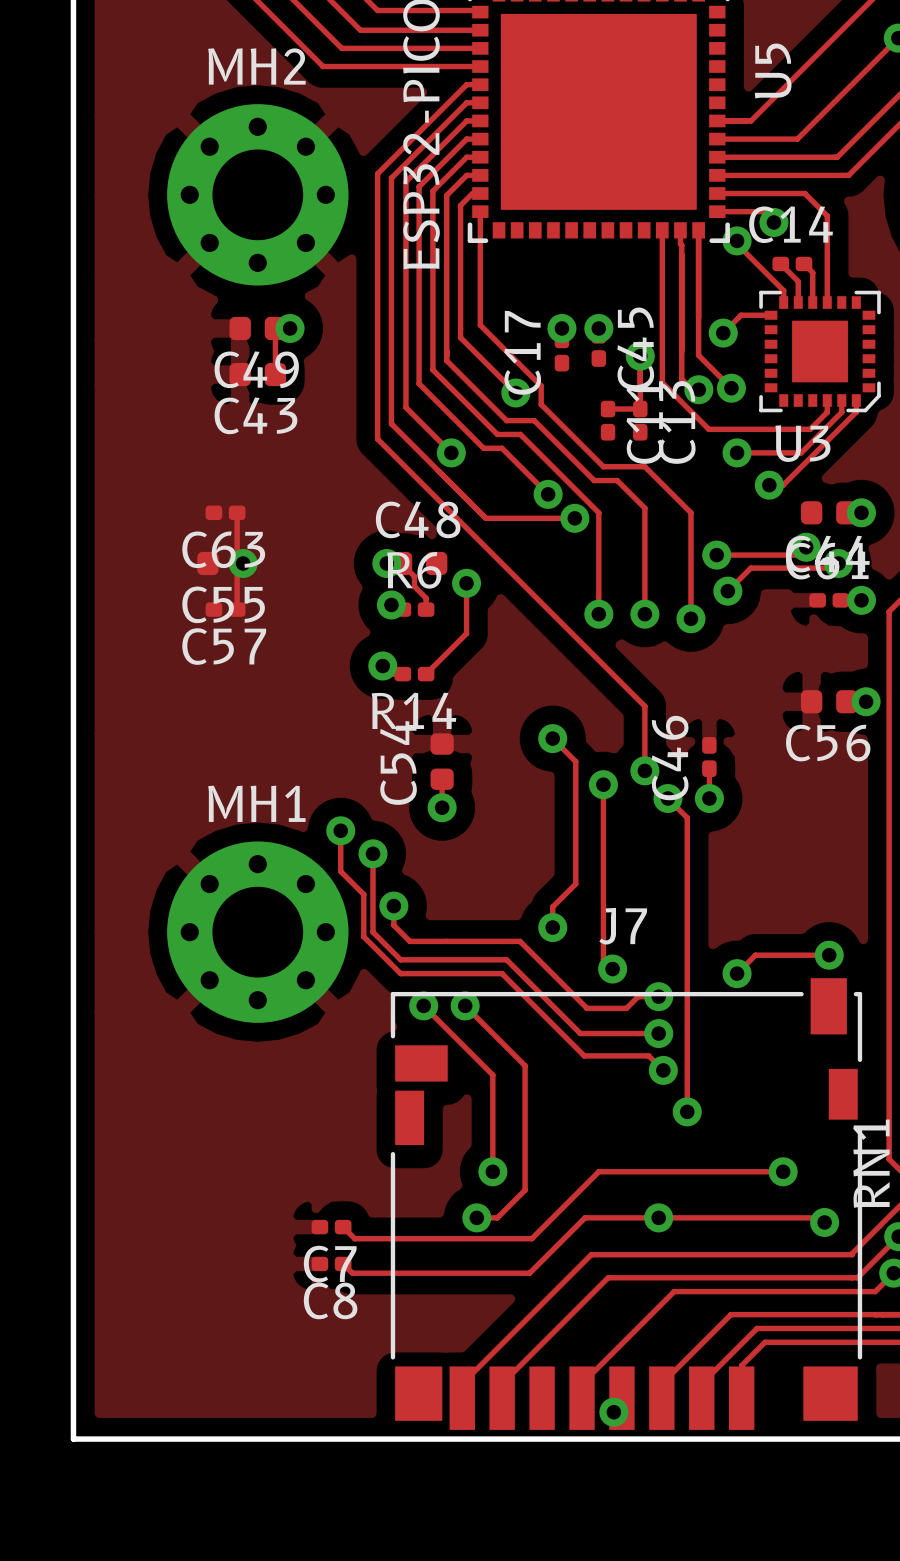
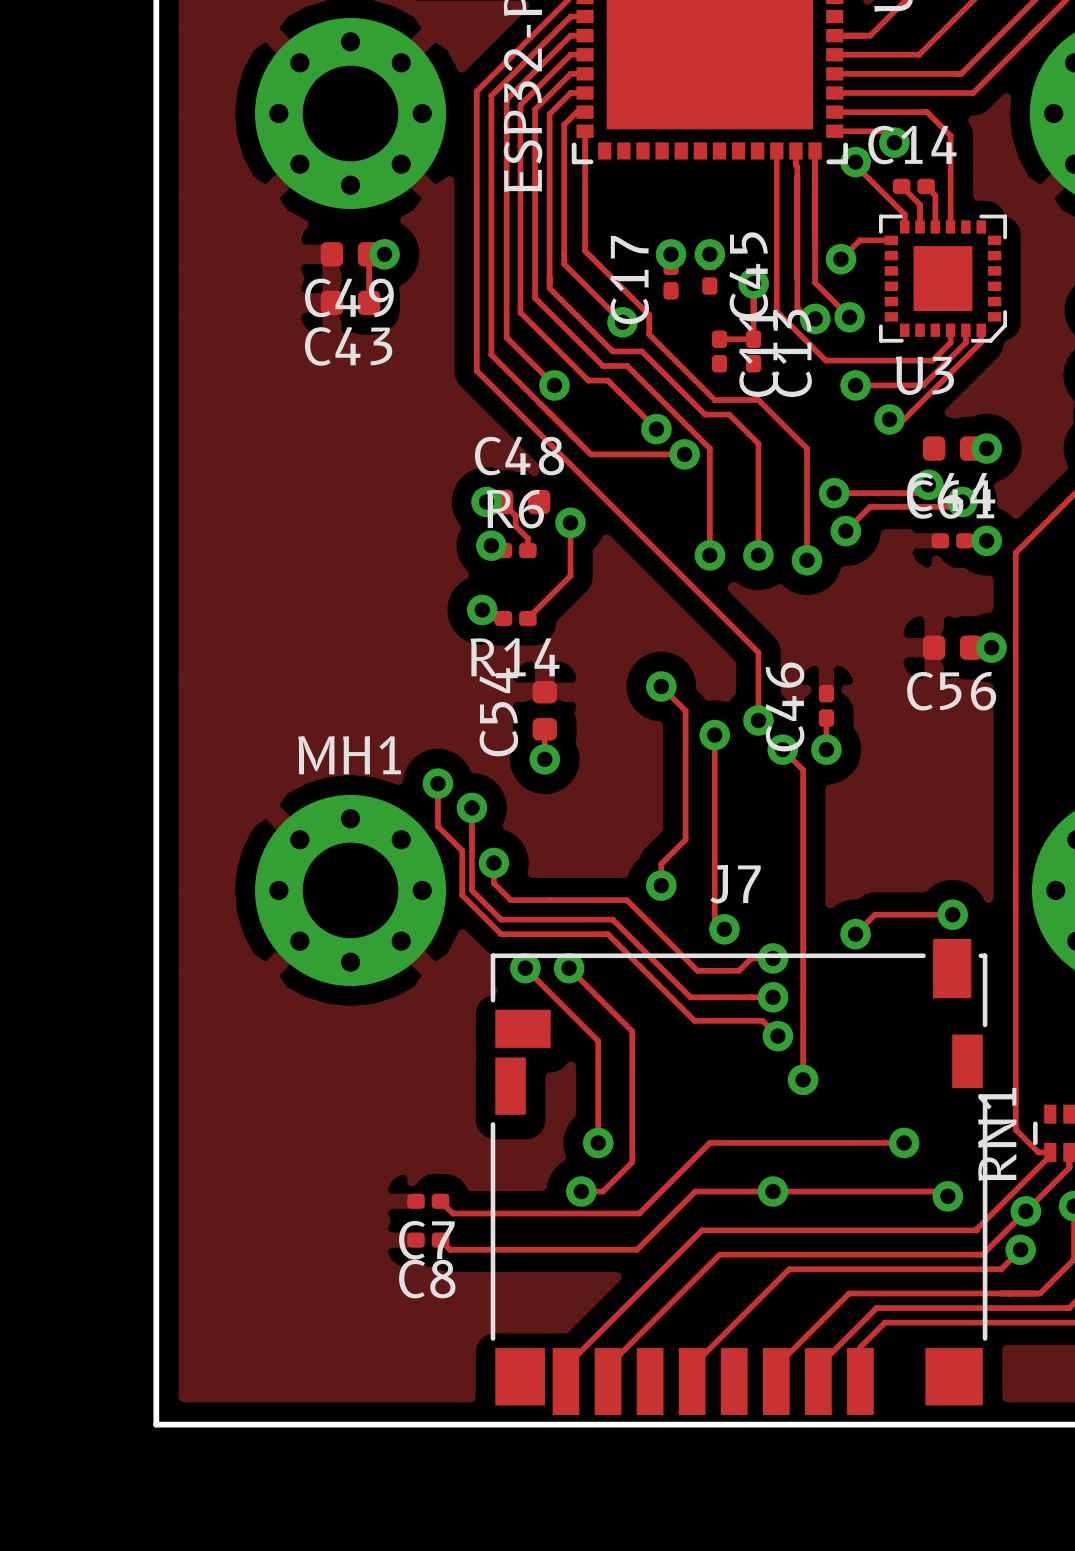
C63: (225, 512) -> none
track: (237, 512) (237, 609) -> none
C55: (225, 563) -> none
via: (243, 563) -> none
C57: (225, 609) -> none
via: (613, 1412) -> none

